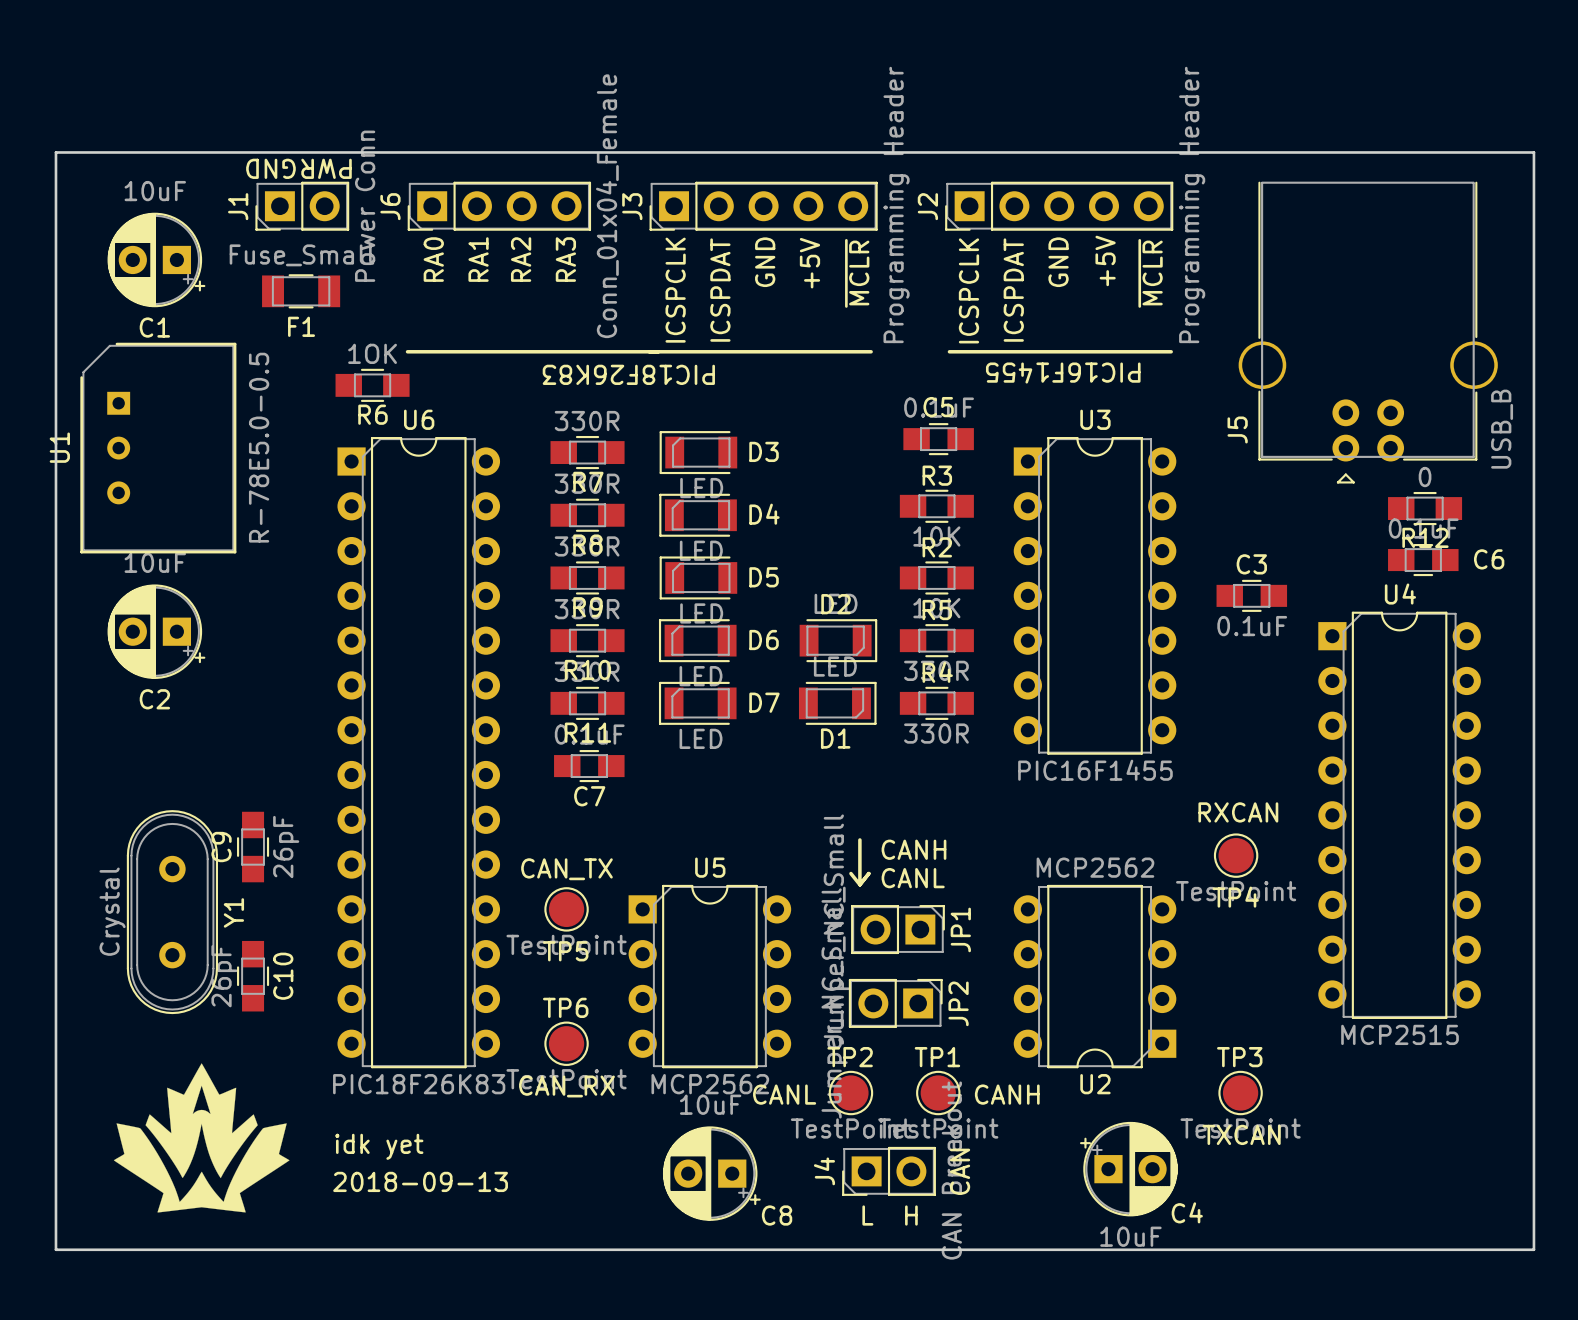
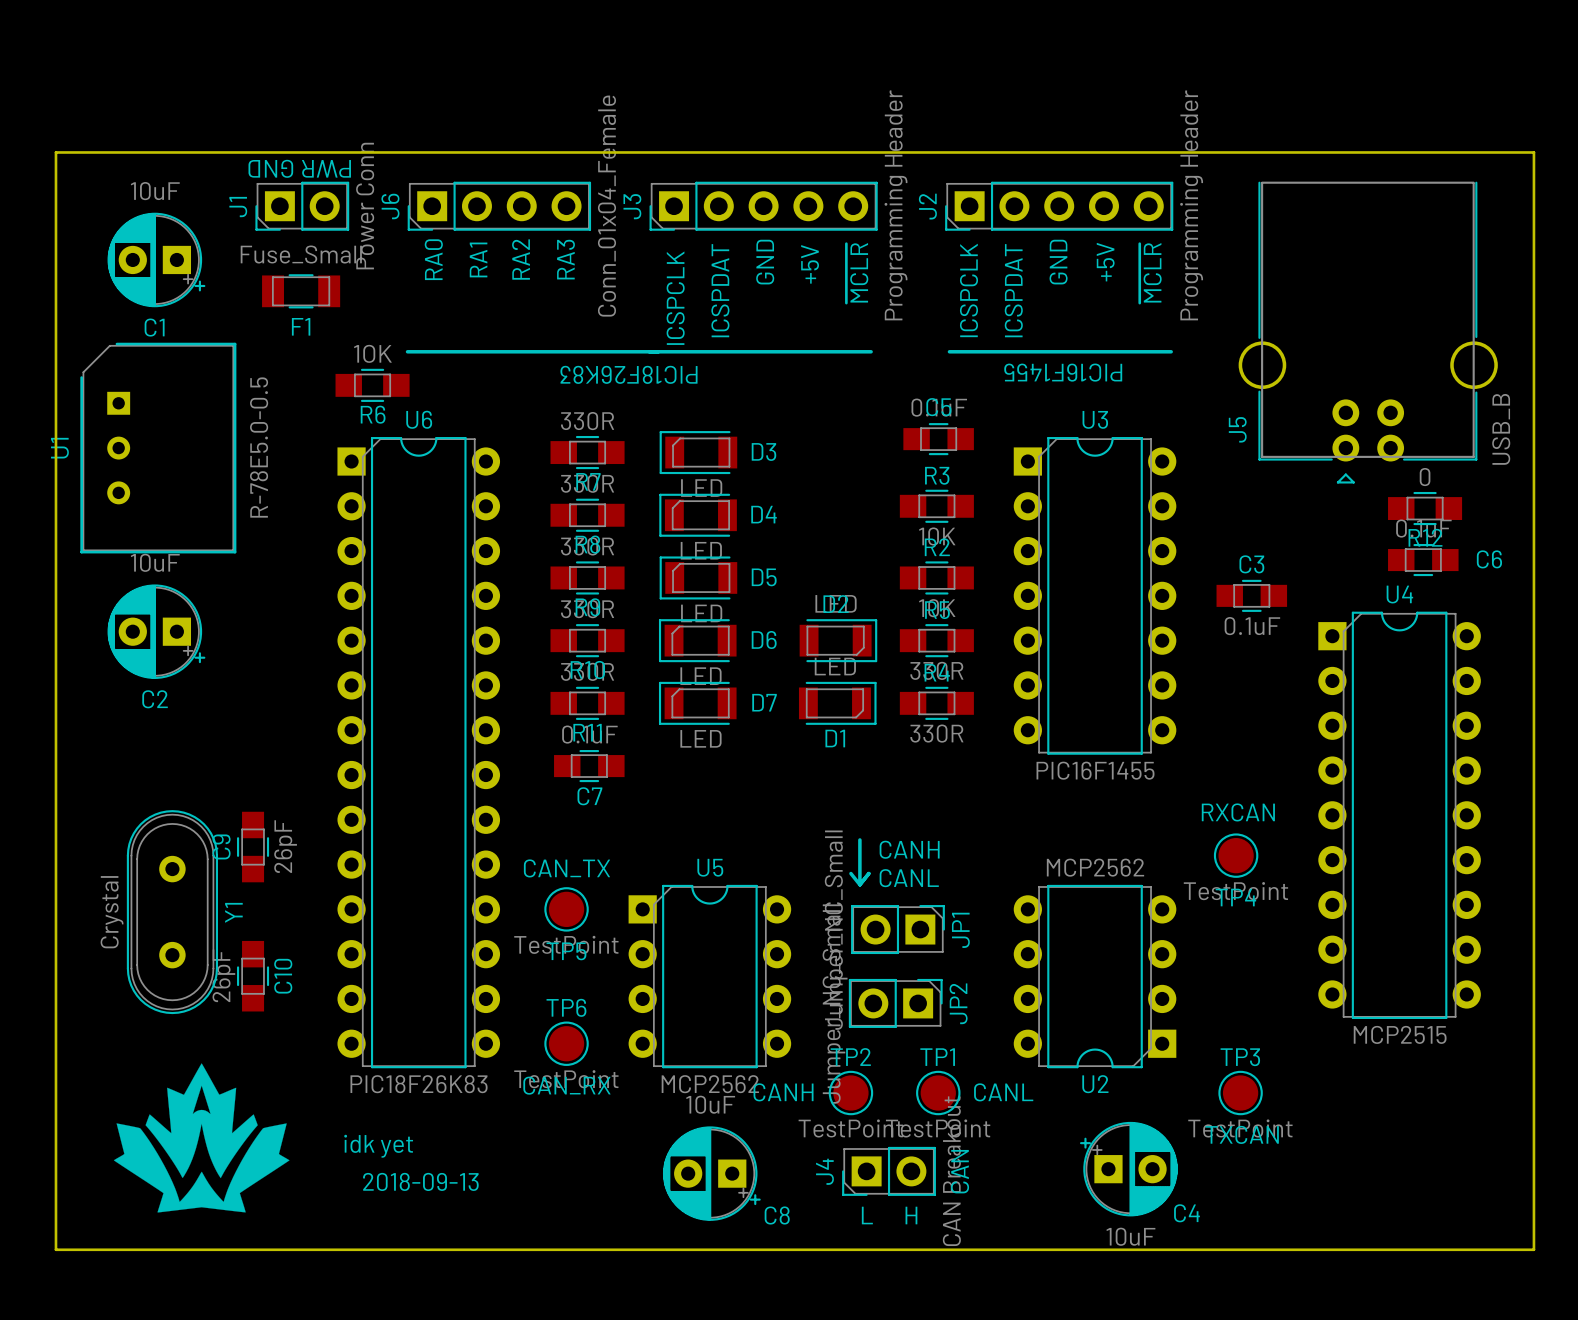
text position: CANL (784, 1094) -> CANL (1003, 1092)
text position: CANH (1007, 1094) -> CANH (783, 1092)

